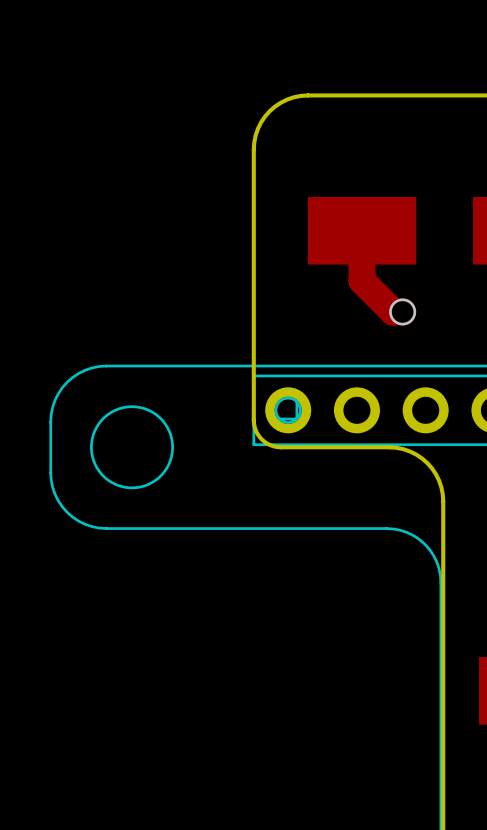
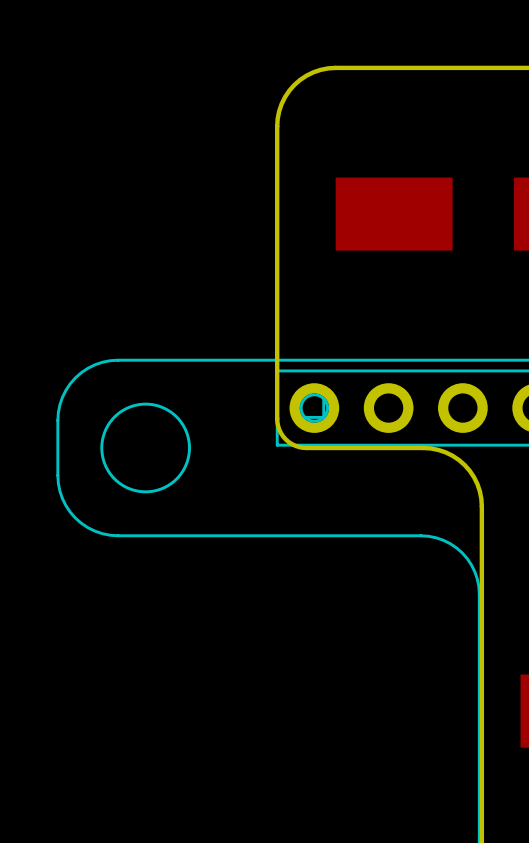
top track: (362, 230) (362, 280) (393, 311) (402, 311) -> none
via: (402, 311) -> none

